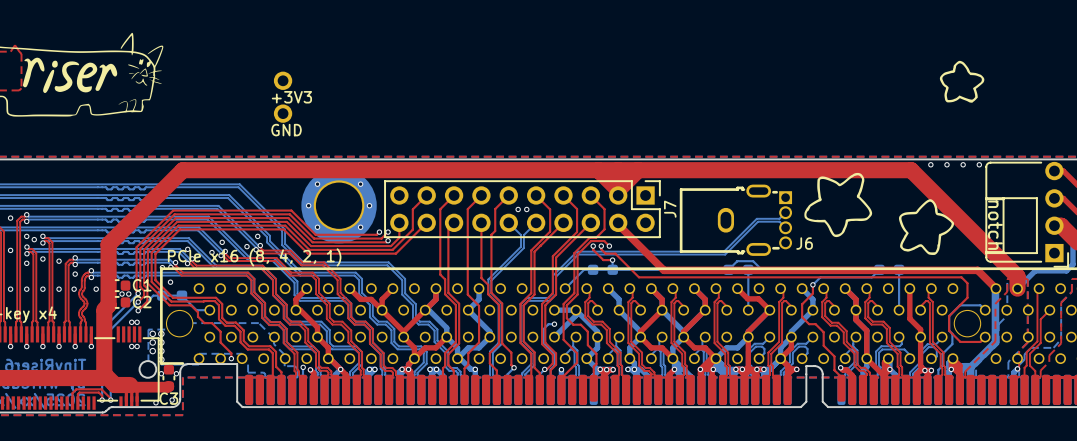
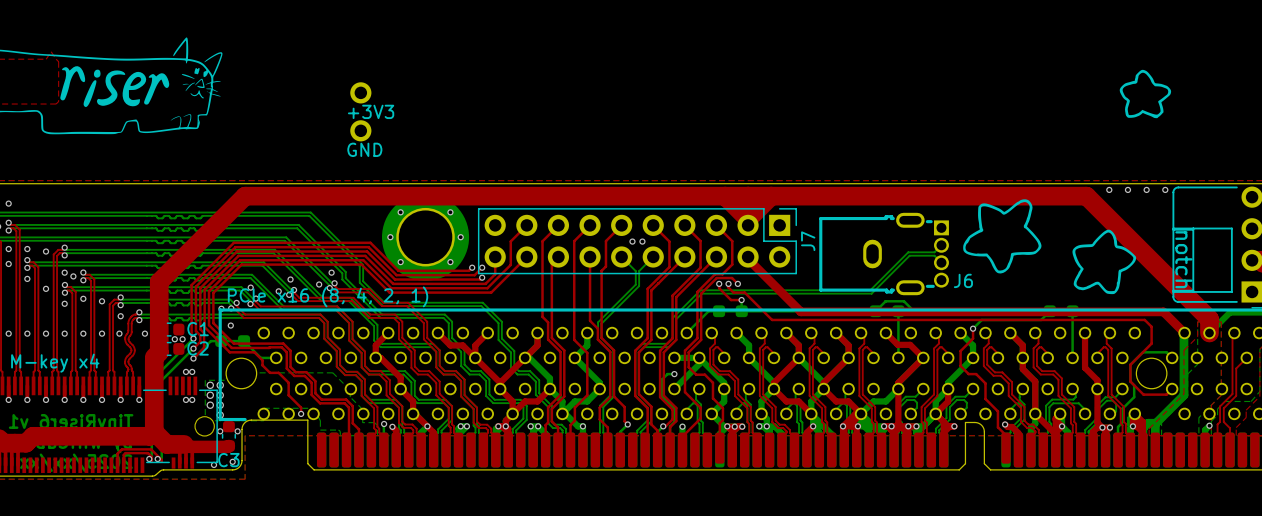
via: none -> (149, 459)
via: none -> (157, 459)
via: (102, 400) -> none
via: (110, 400) -> none

